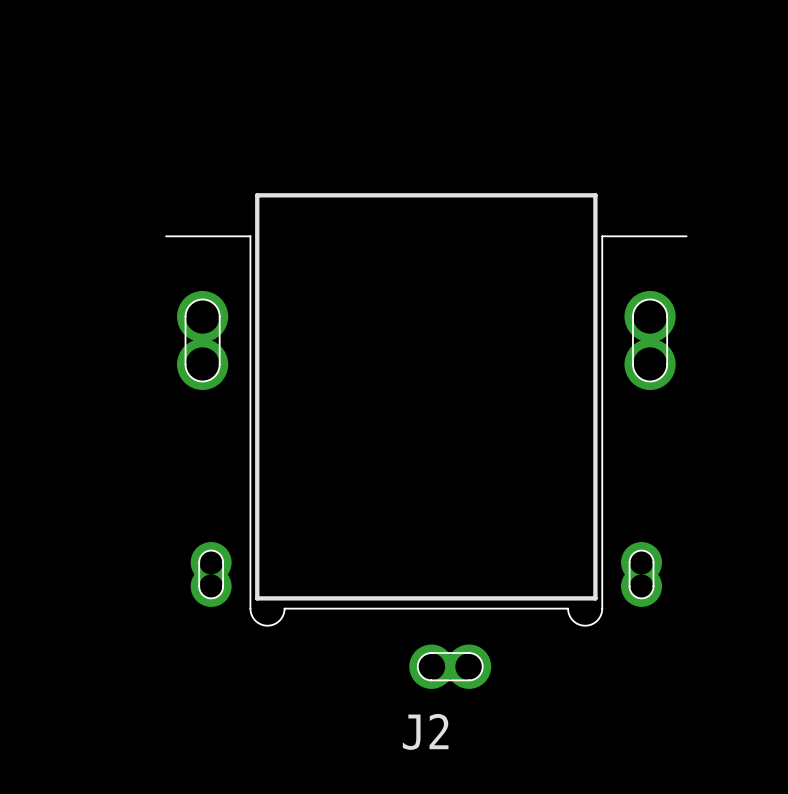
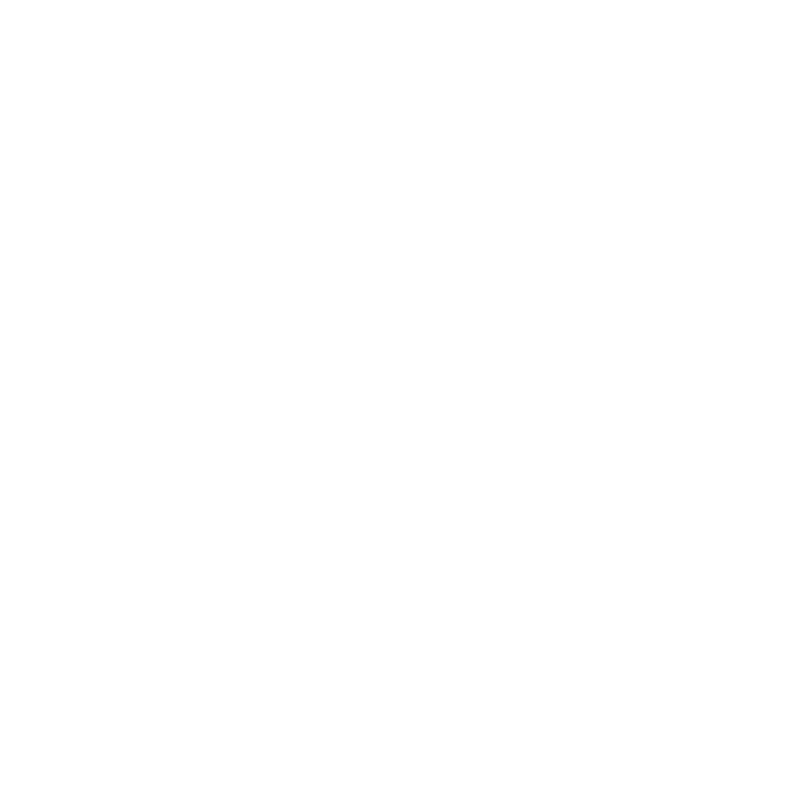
J2: (426, 441) -> none

